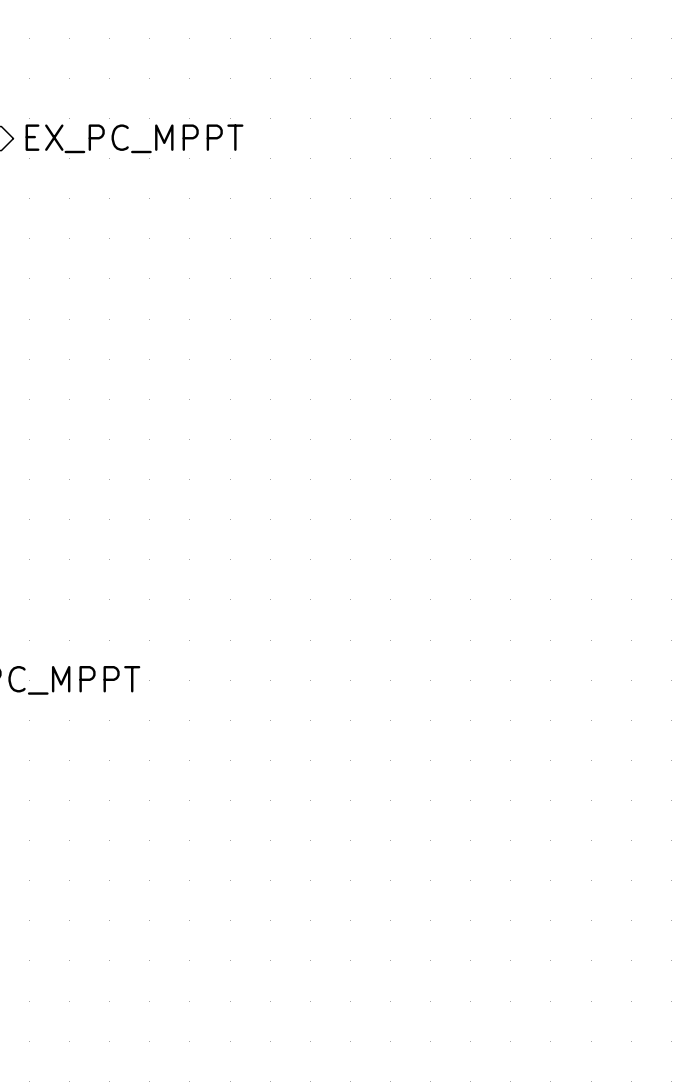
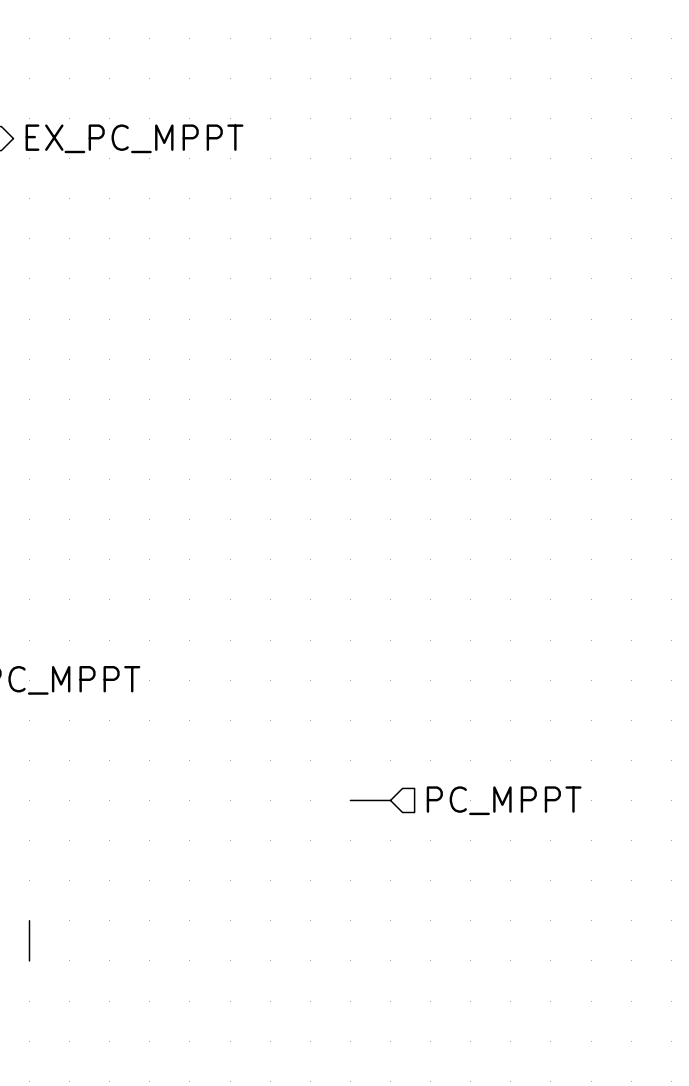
wire: none -> (350, 800) (390, 800)
hierarchical label: none -> PC_MPPT (504, 800)
wire: none -> (29, 920) (29, 960)

